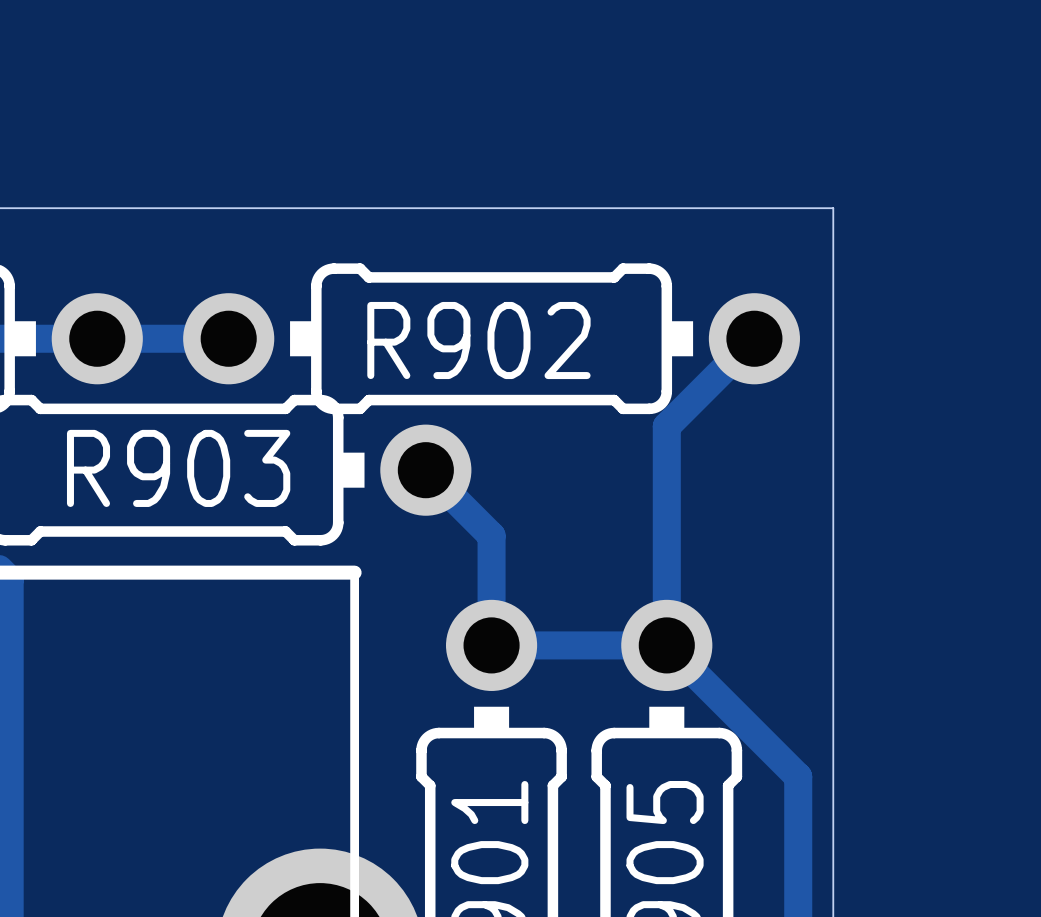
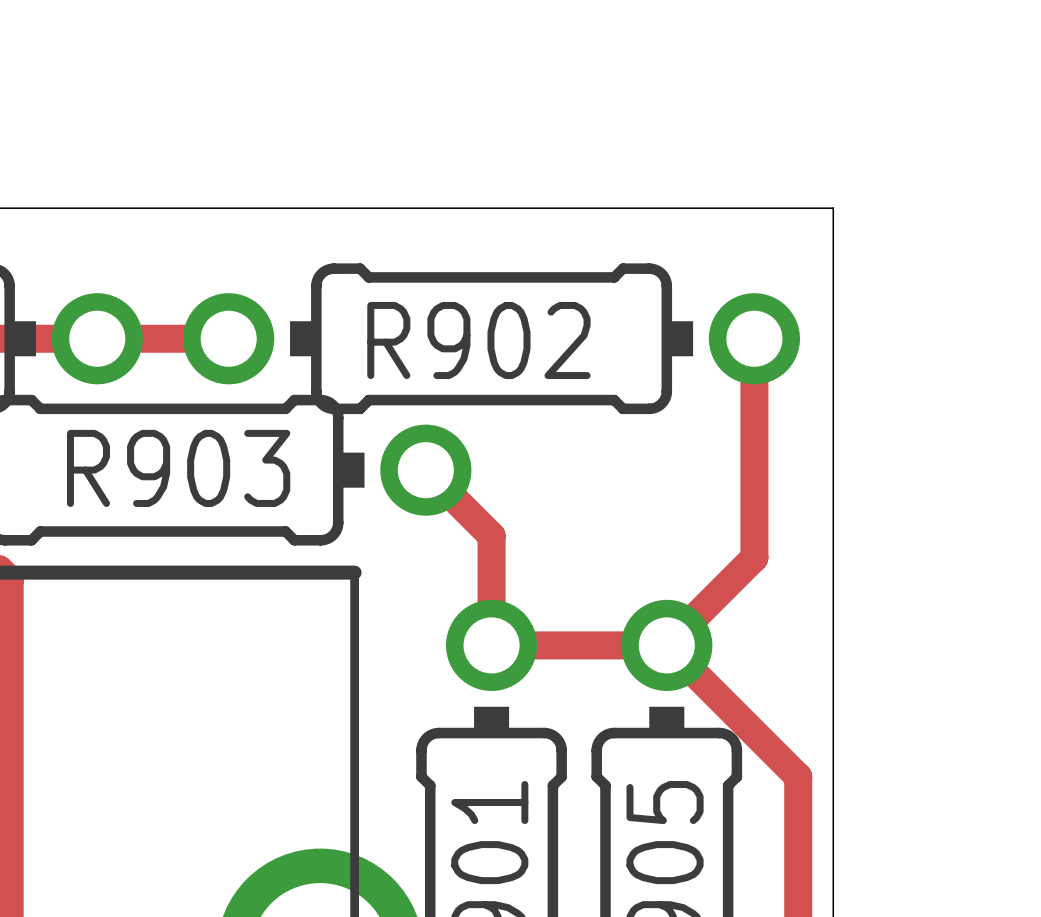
track: (754, 338) (666, 426) (666, 645) -> (754, 338) (754, 557) (666, 645)

